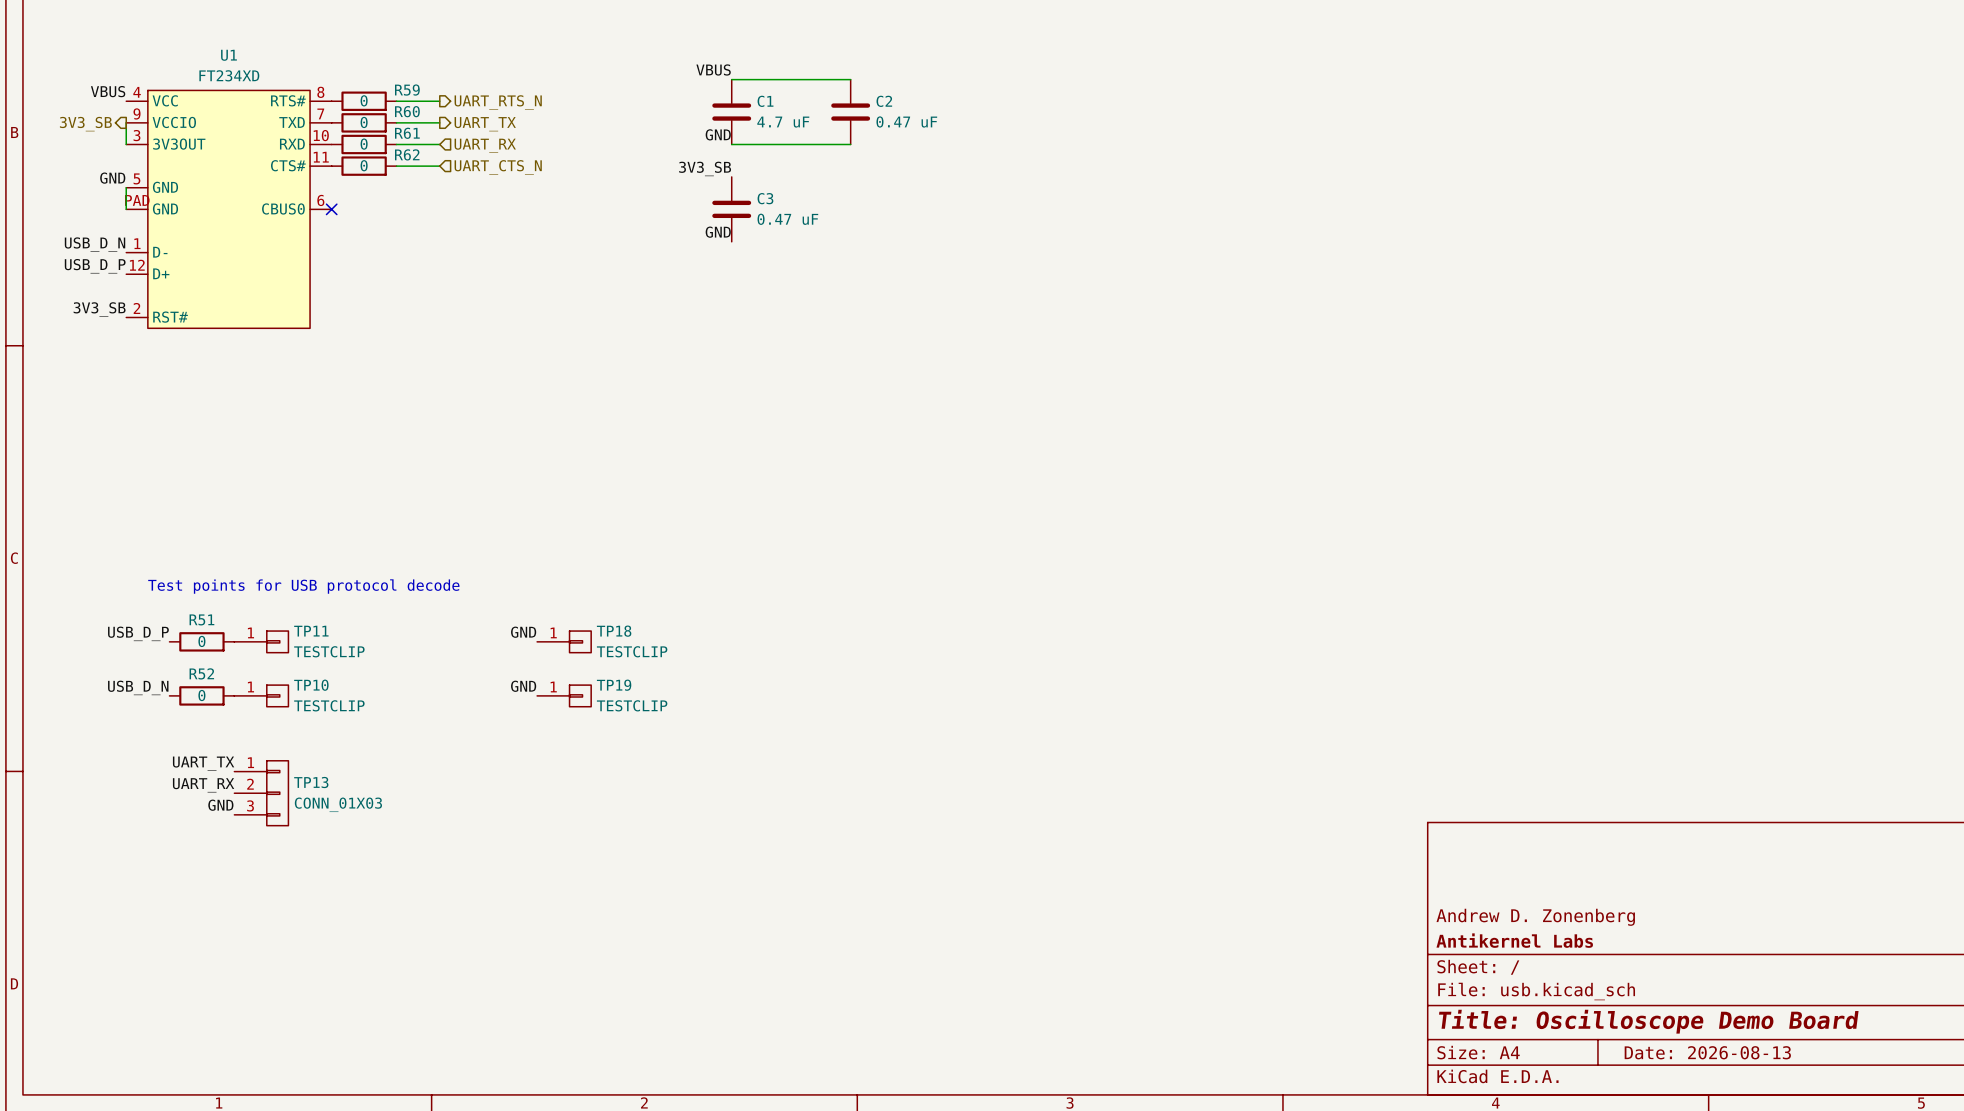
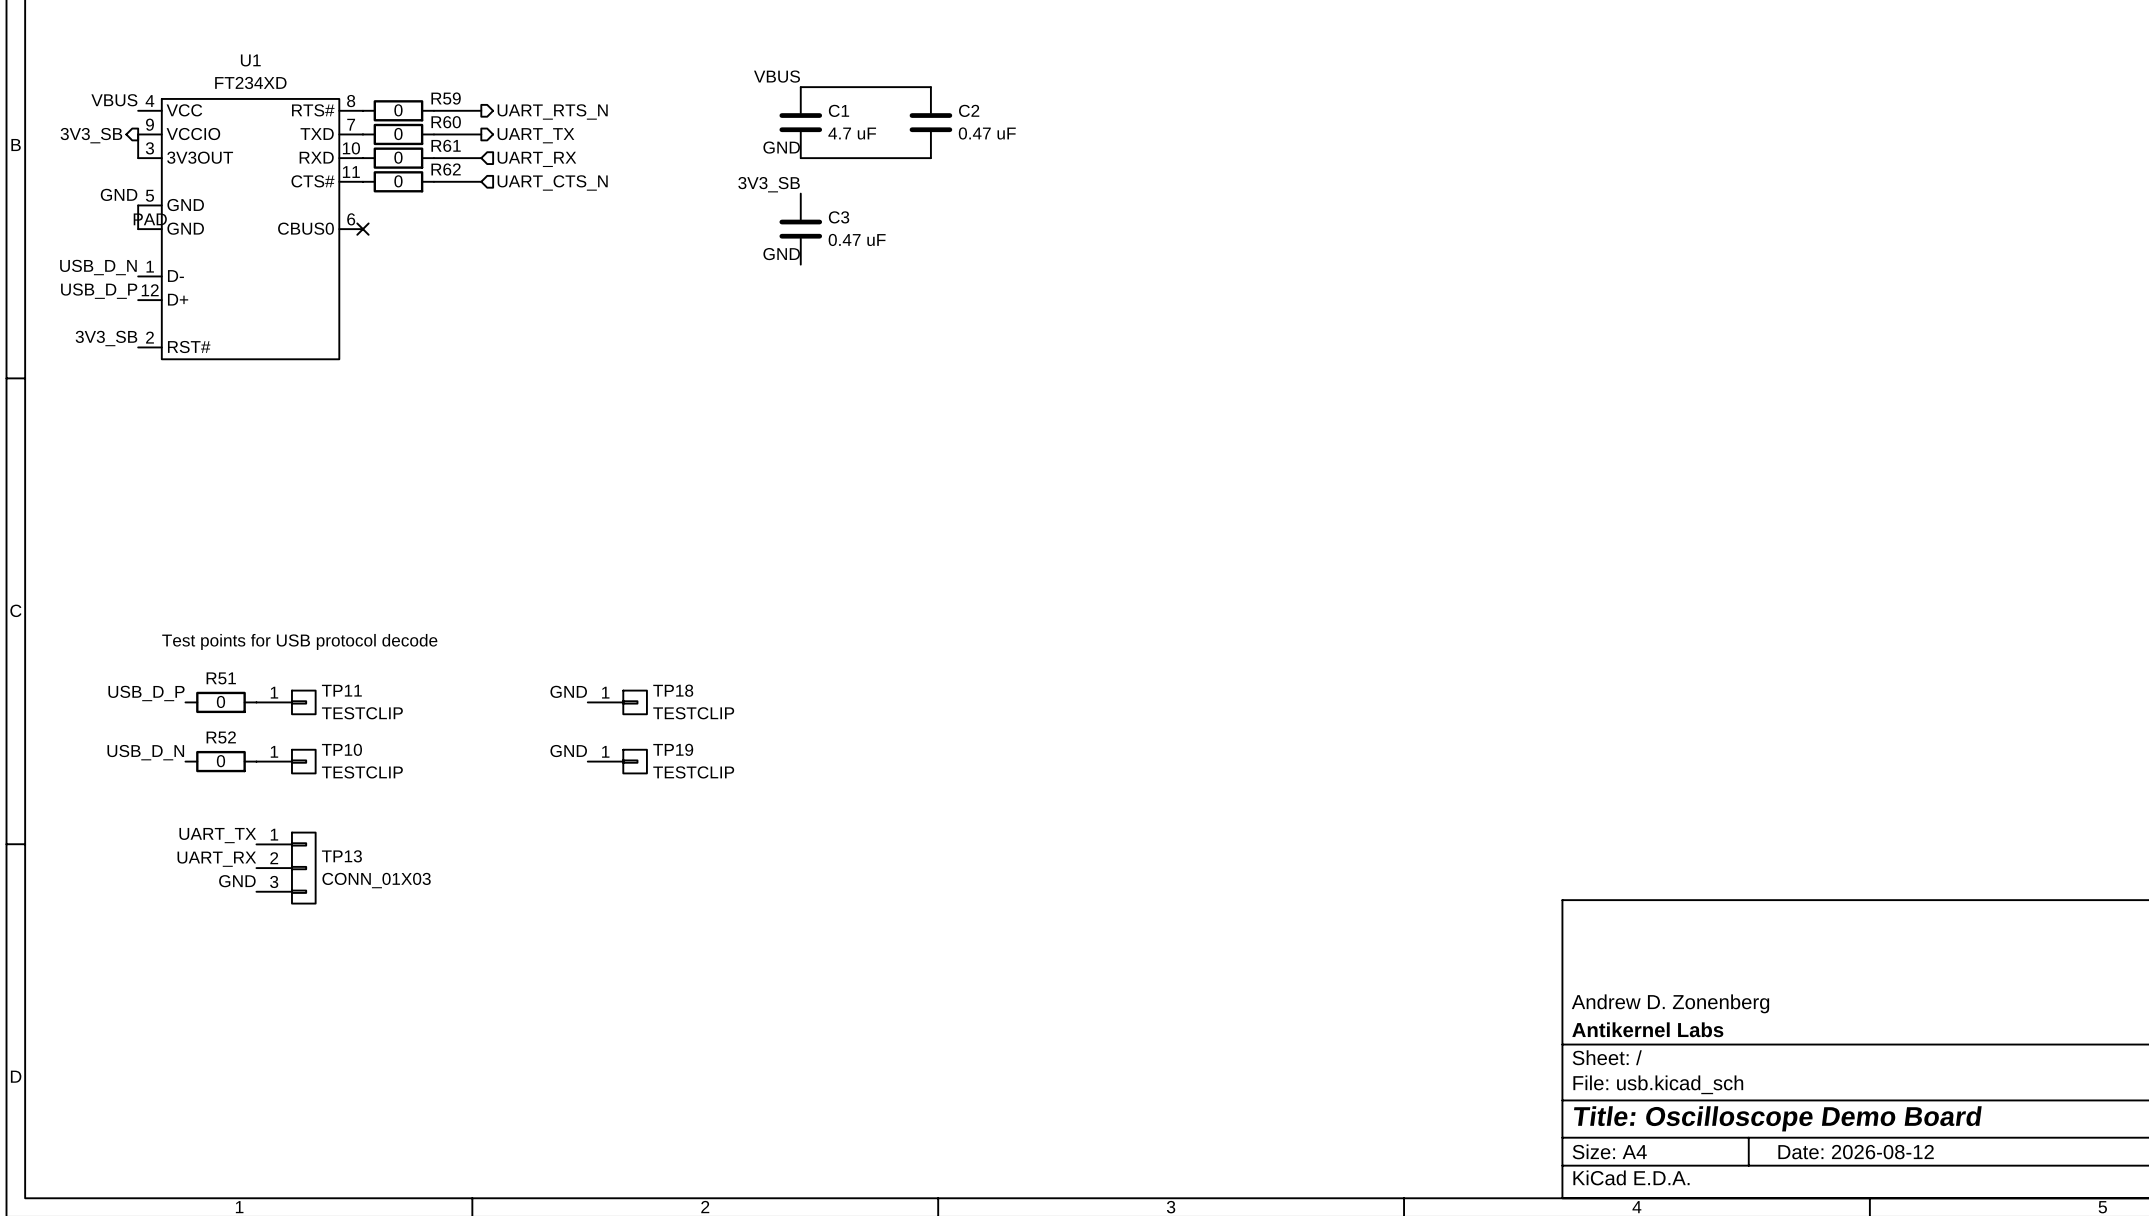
title block: Date: 2026-08-13 (1707, 1052) -> Date: 2026-08-12 (1856, 1152)

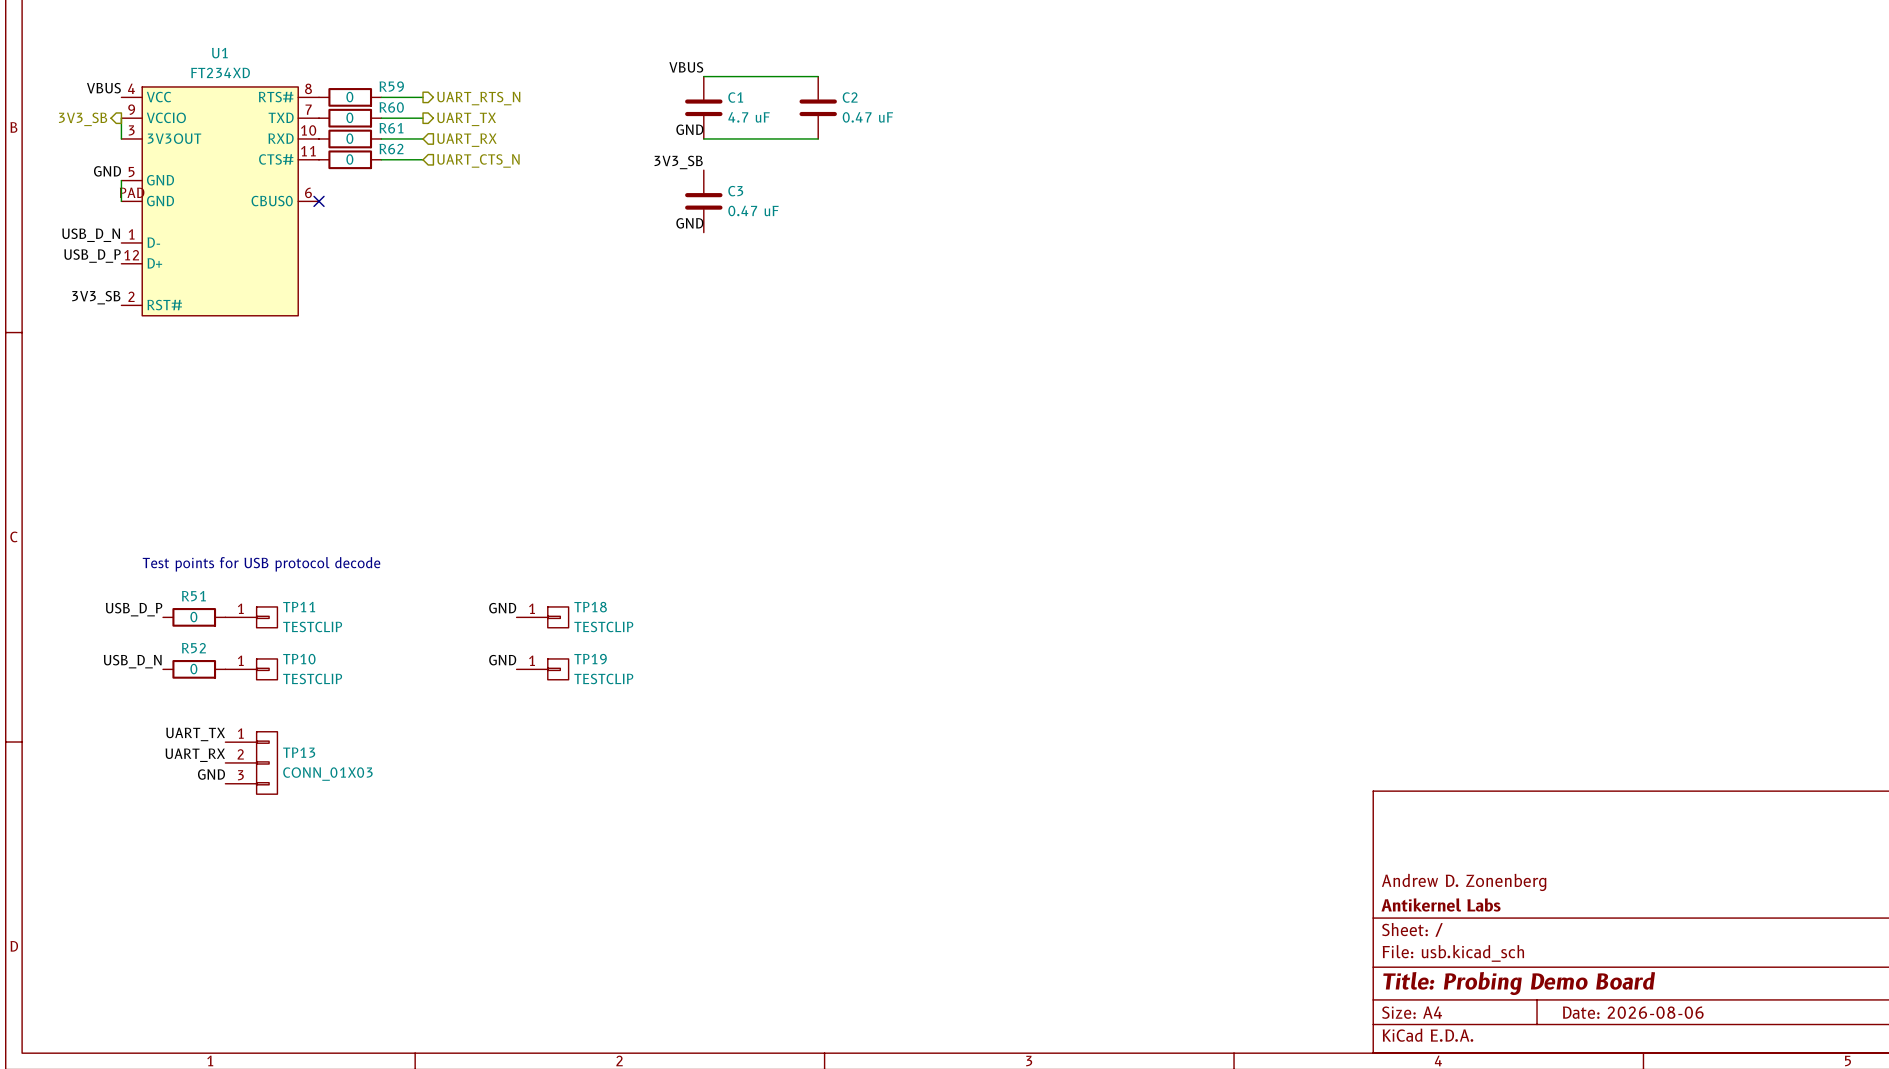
title block: Title: Oscilloscope Demo Board (1777, 1118) -> Title: Probing Demo Board (1519, 983)
title block: Date: 2026-08-12 (1856, 1152) -> Date: 2026-08-06 (1633, 1012)

